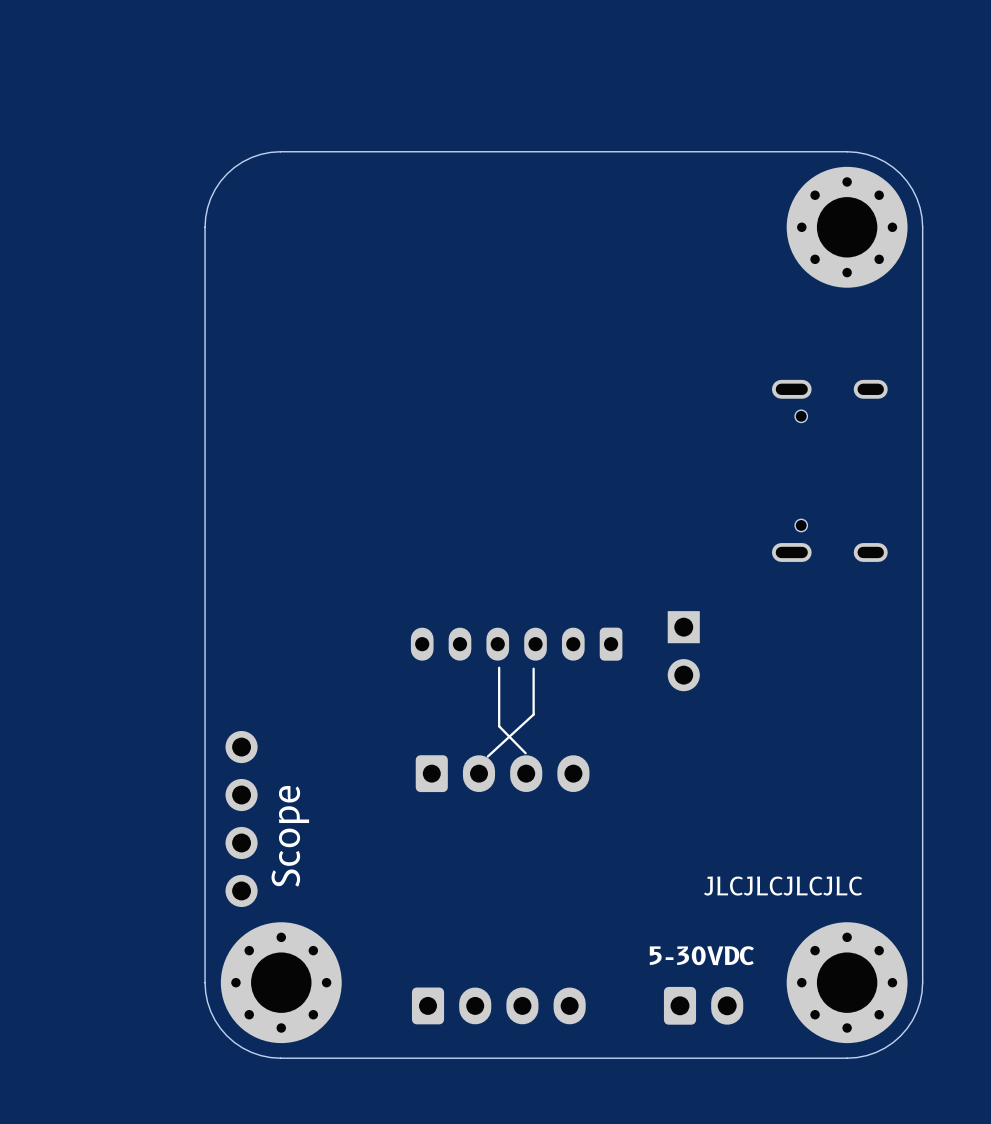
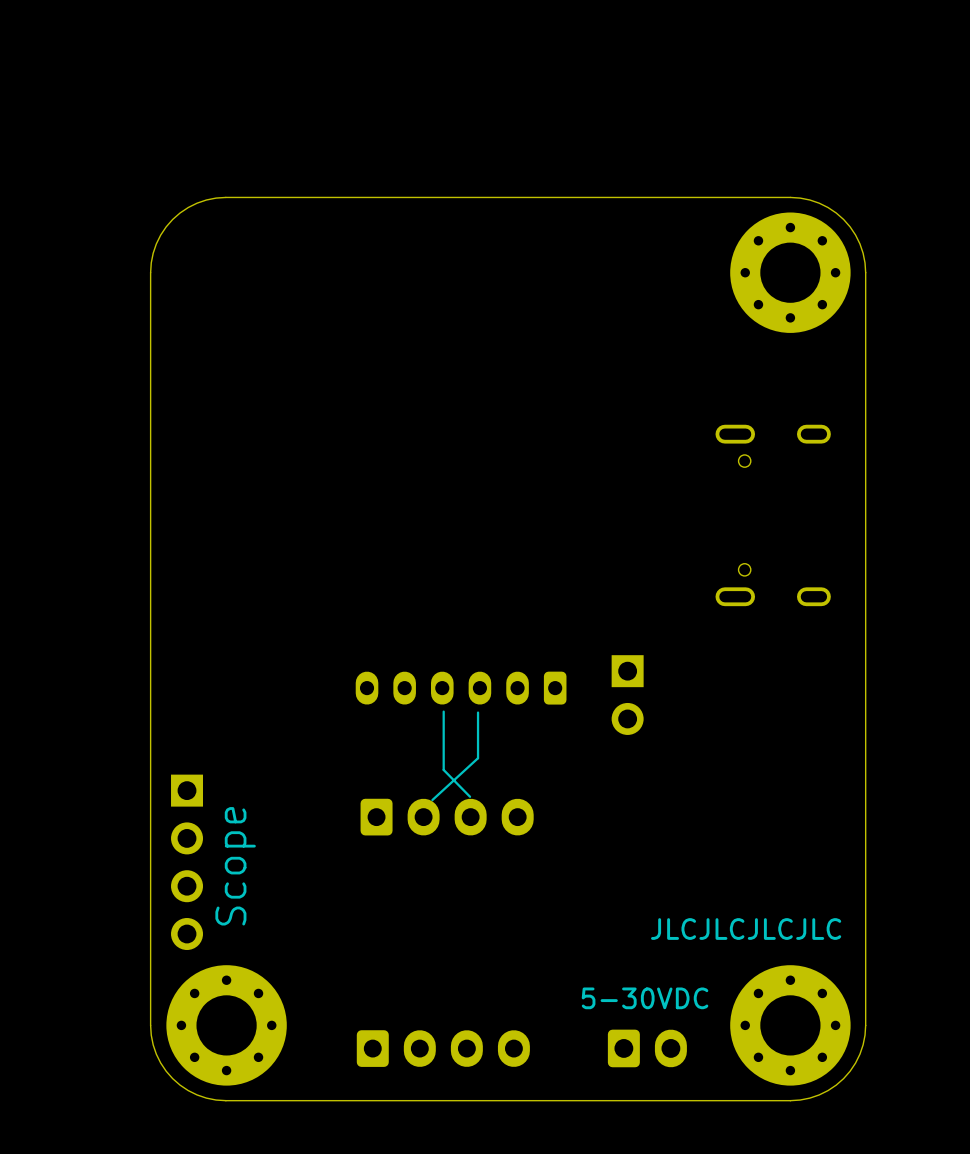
part footprint: [225, 731, 258, 908] -> [171, 774, 204, 951]

